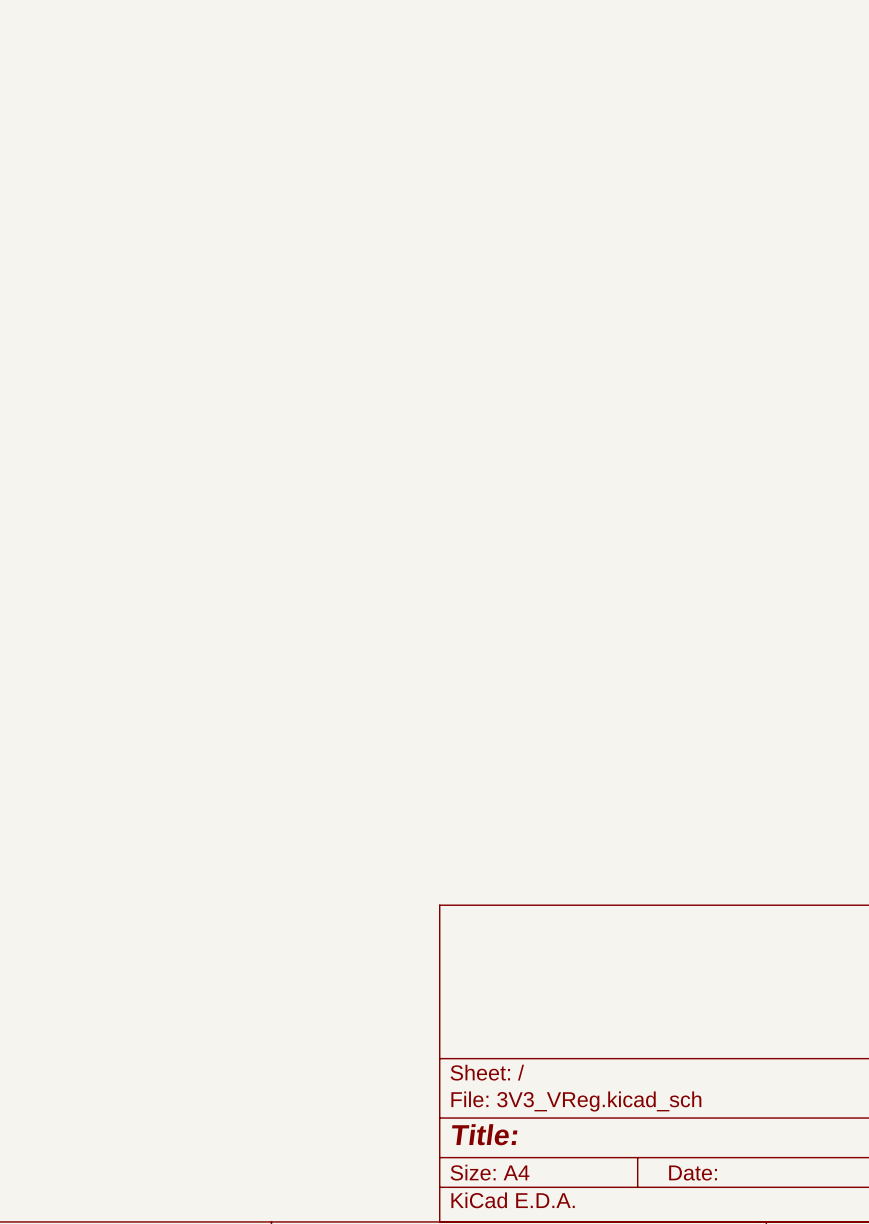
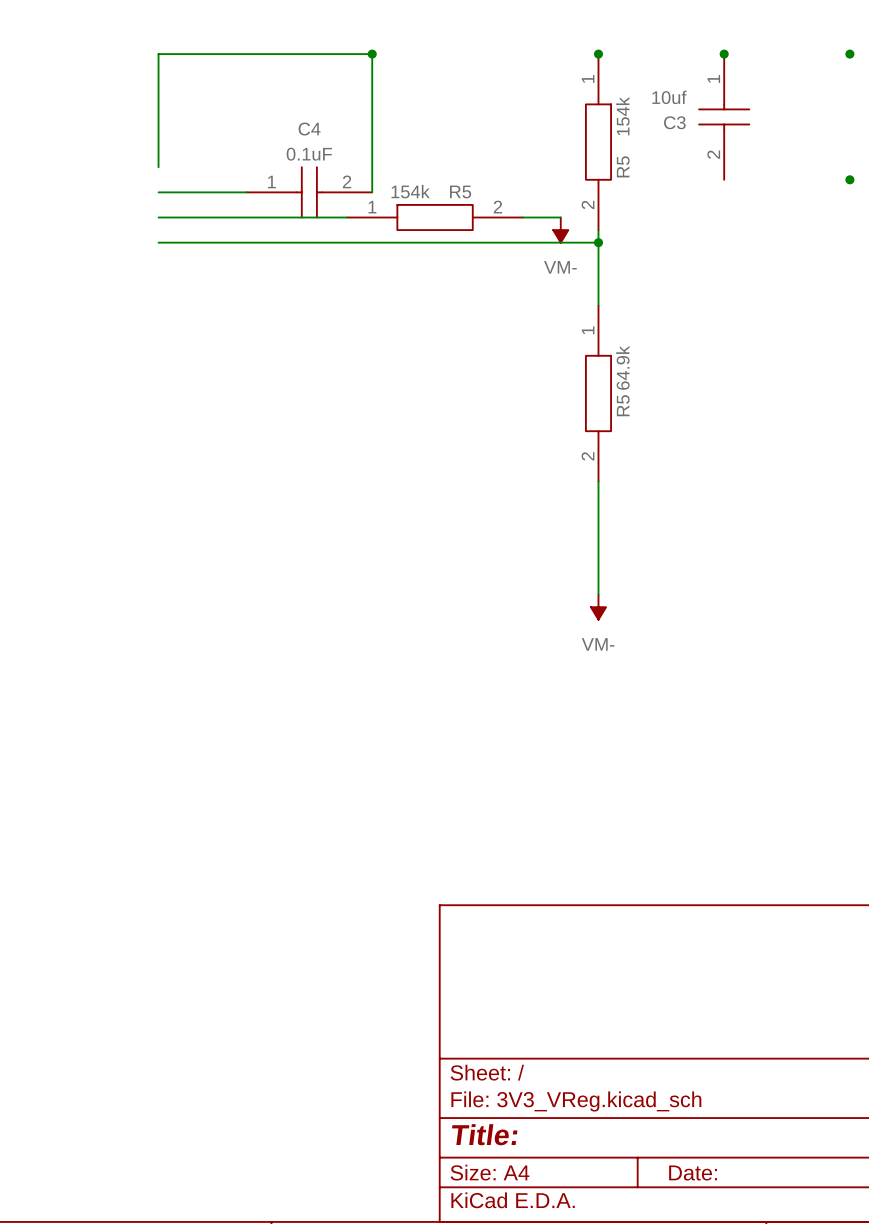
junction: none -> (372, 54)
junction: none -> (598, 54)
junction: none -> (724, 54)
junction: none -> (849, 54)
C3: none -> 10uf (724, 116)
R5: none -> 154k (598, 142)
wire: none -> (158, 167) (158, 54) (372, 54) (372, 192)
junction: none -> (849, 179)
wire: none -> (158, 192) (246, 192)
C4: none -> 0.1uF (309, 192)
wire: none -> (158, 217) (347, 217)
R5: none -> 154k (435, 217)
wire: none -> (523, 217) (560, 217)
power symbol: none -> VM- (560, 230)
wire: none -> (598, 230) (598, 305)
wire: none -> (158, 242) (598, 242)
junction: none -> (598, 242)
R5: none -> 64.9k (598, 393)
wire: none -> (598, 481) (598, 594)
power symbol: none -> VM- (598, 607)

